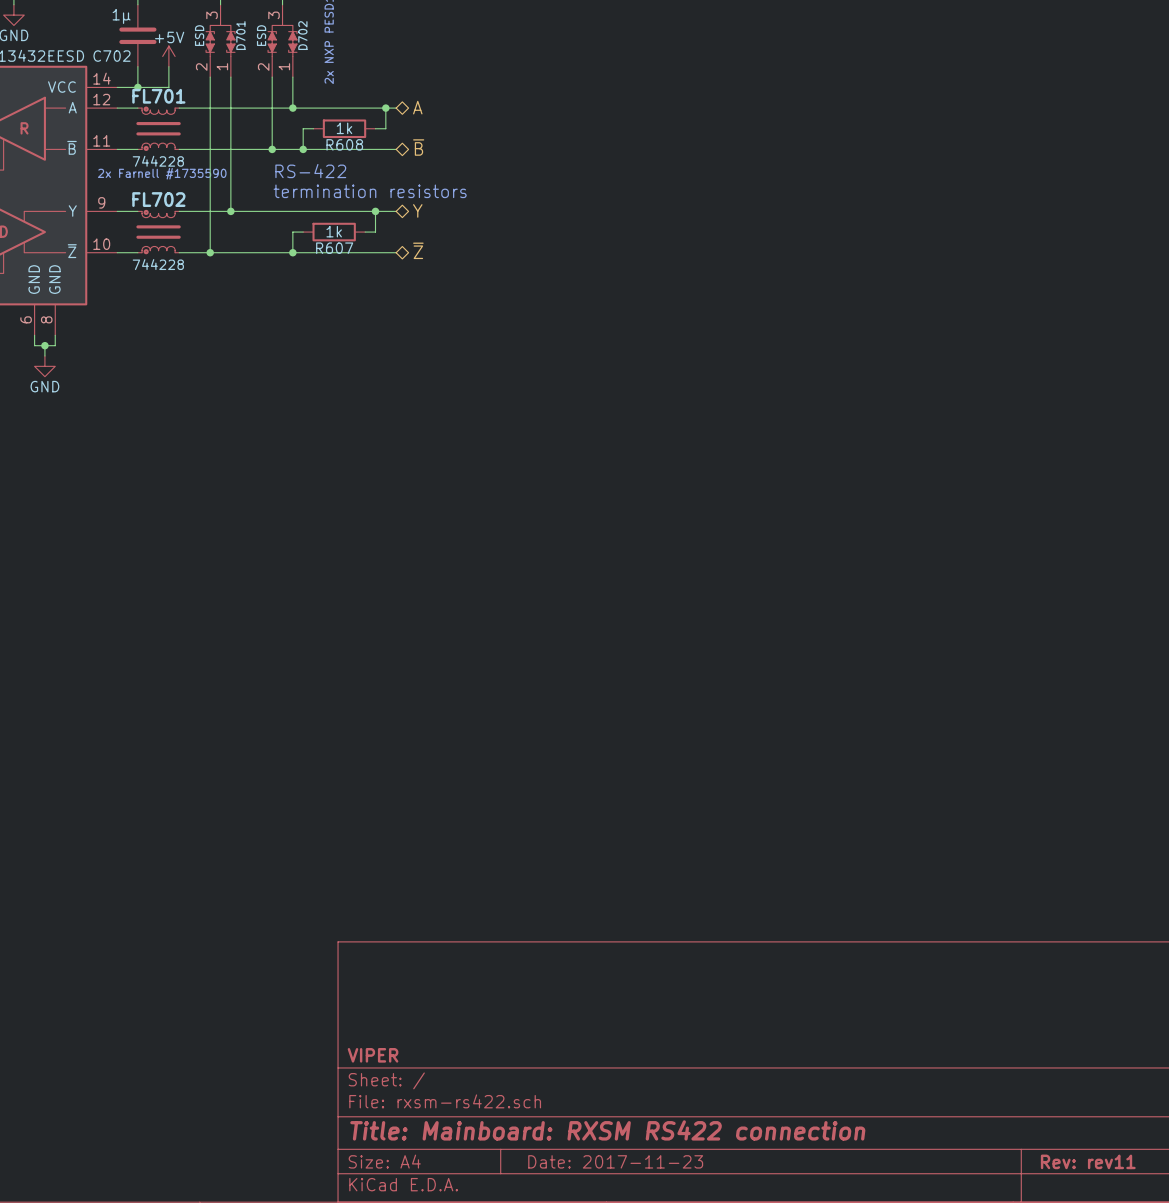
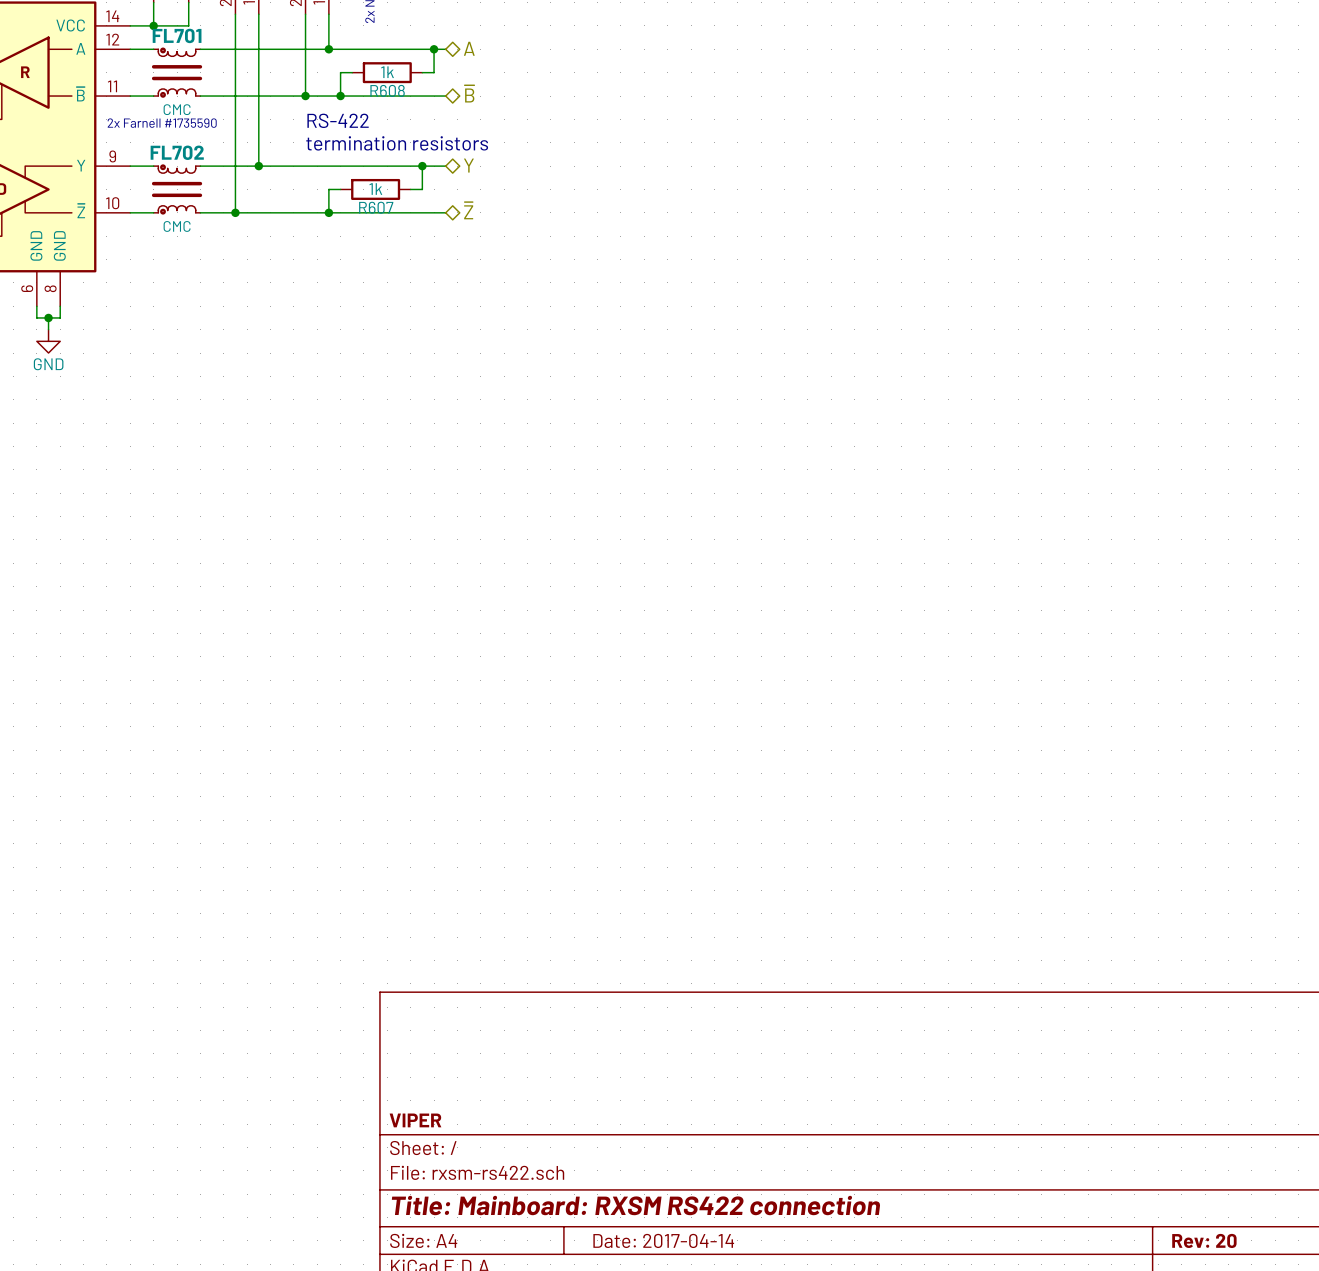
FL701 value: 744228 (158, 161) -> CMC (177, 109)
FL702 value: 744228 (158, 264) -> CMC (177, 226)
title block: Date: 2017-11-23 (615, 1161) -> Date: 2017-04-14 (663, 1240)
title block: Rev: rev11 (1088, 1161) -> Rev: 20 (1204, 1240)

